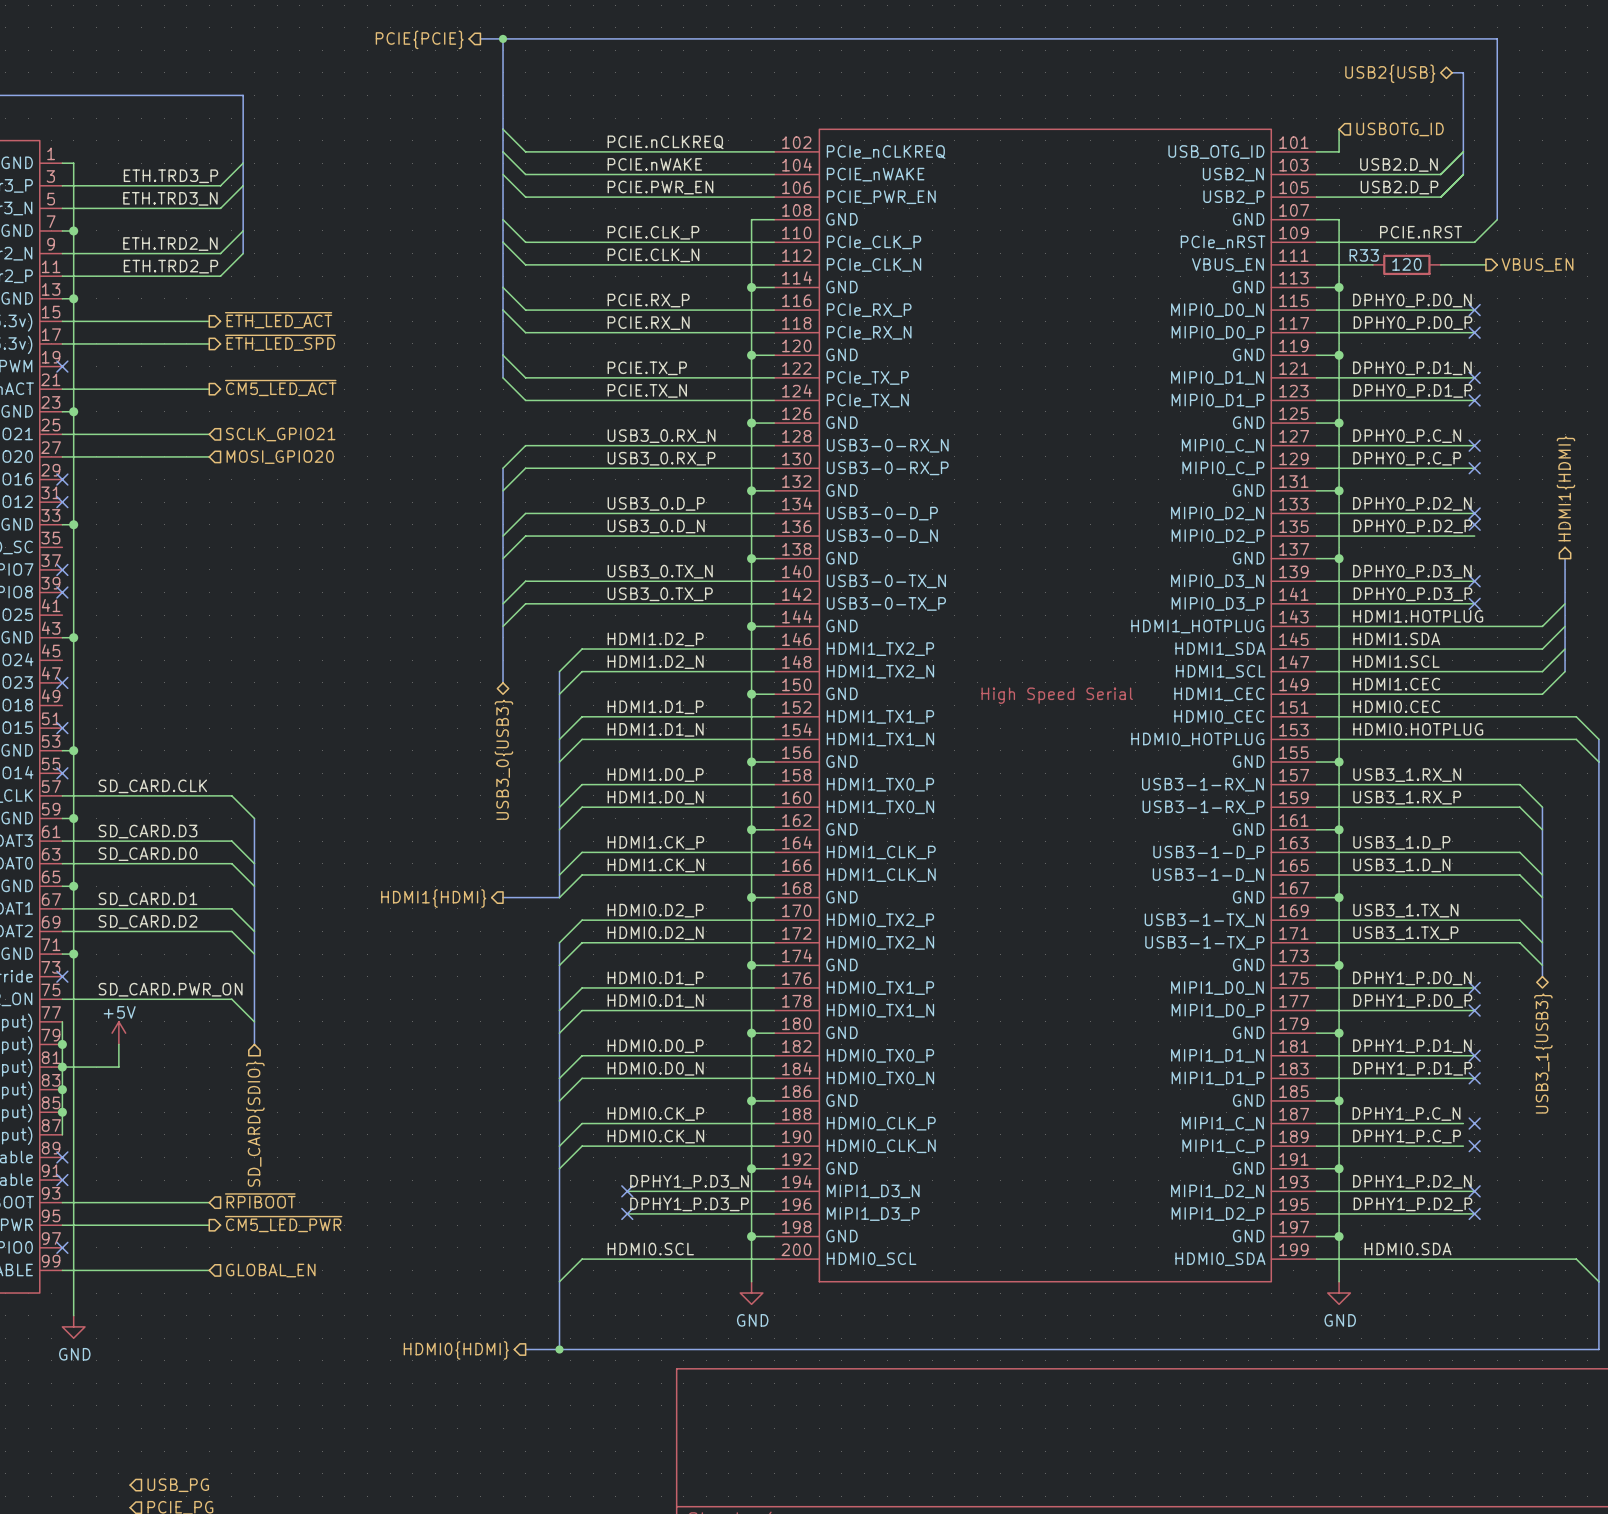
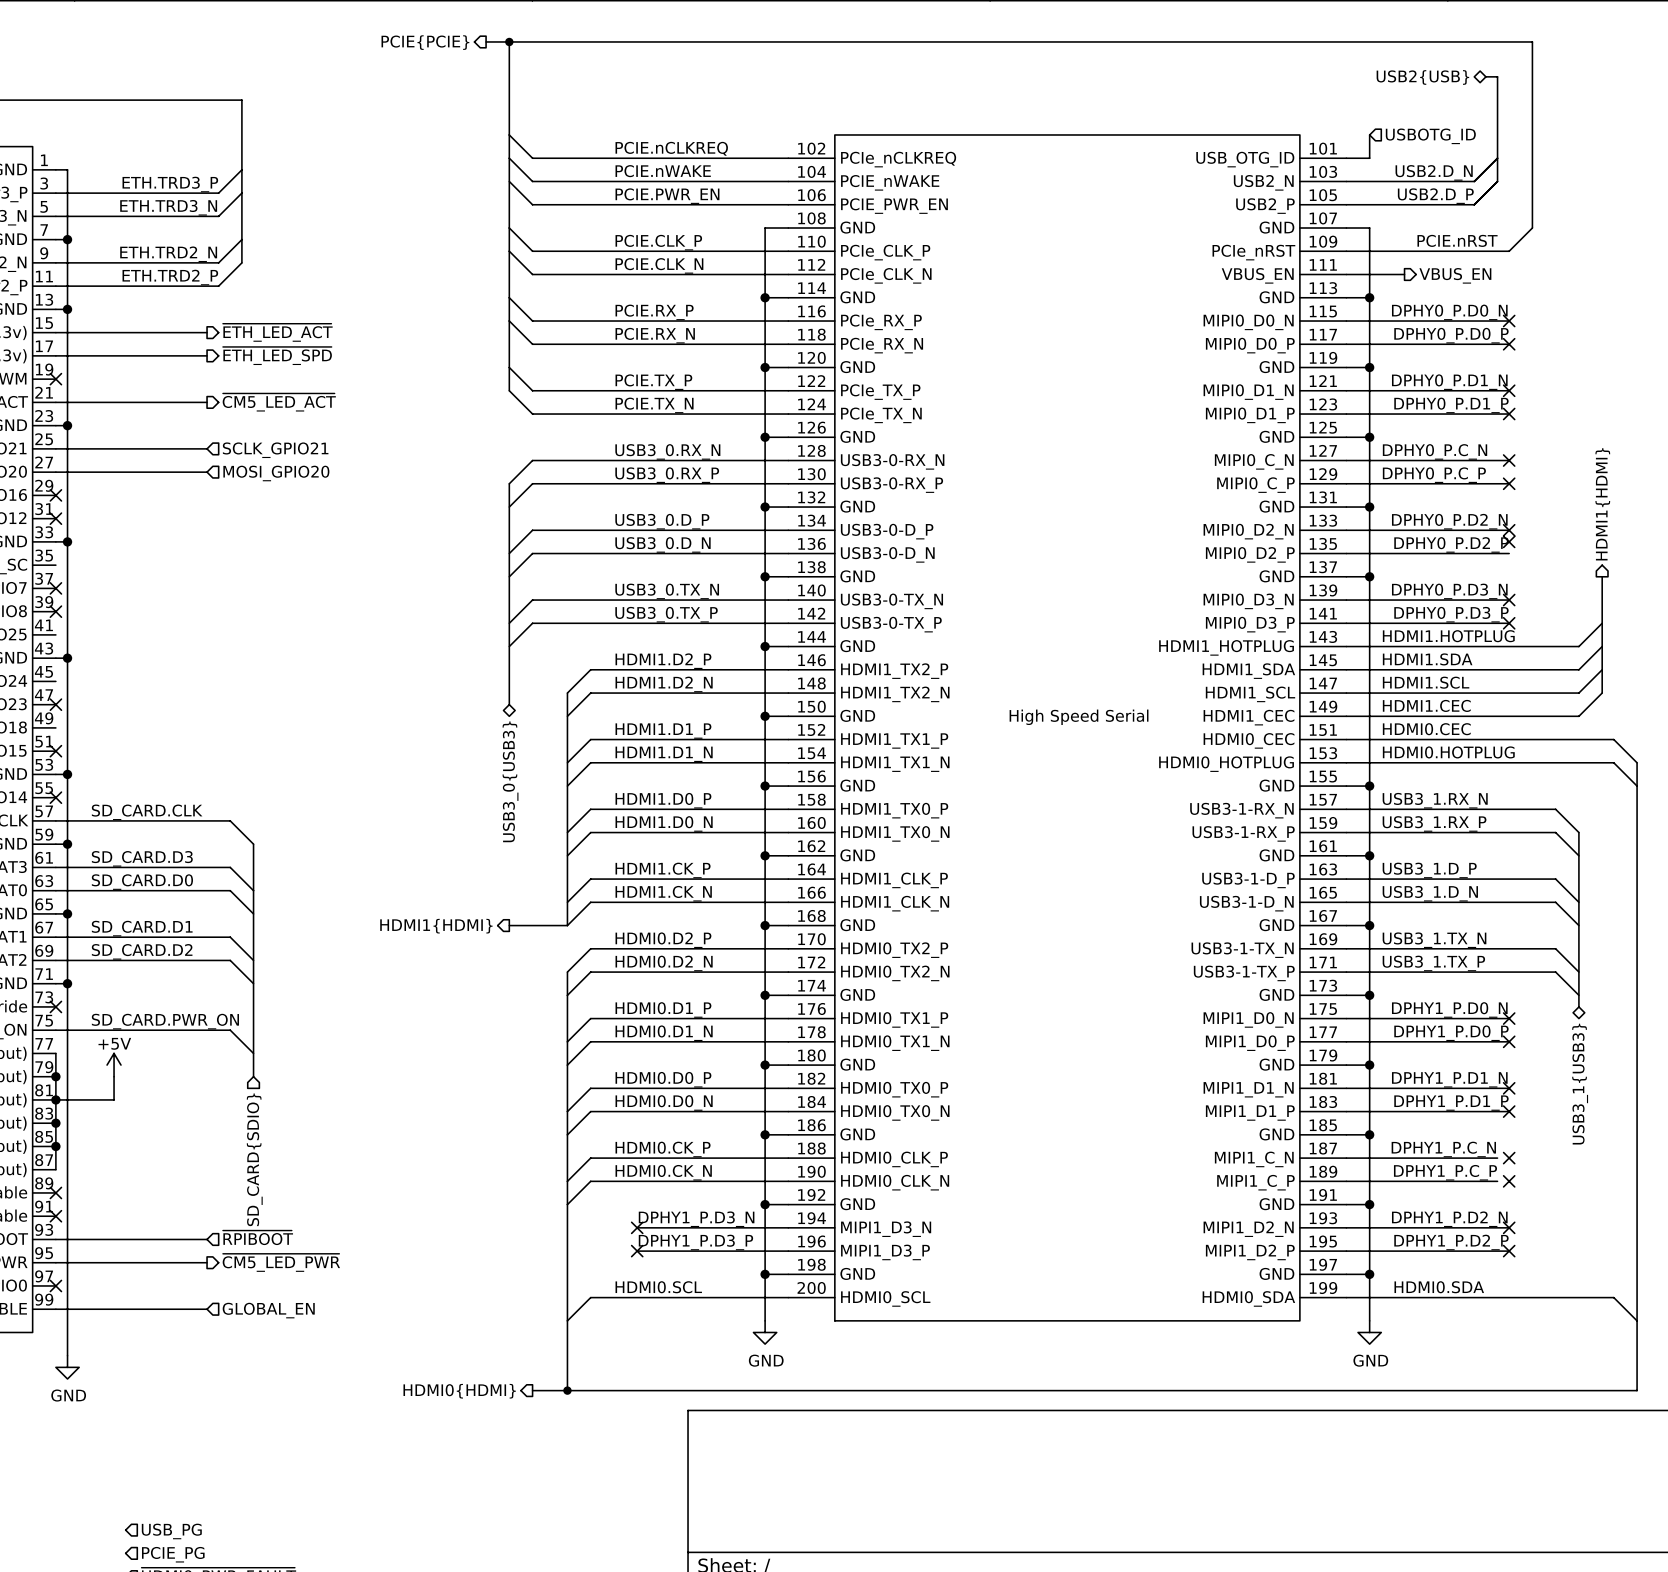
R33: 120 (1406, 264) -> none
wire: (1440, 264) (1485, 264) -> none
hierarchical label position: VBUS_EN (1537, 265) -> VBUS_EN (1455, 275)

